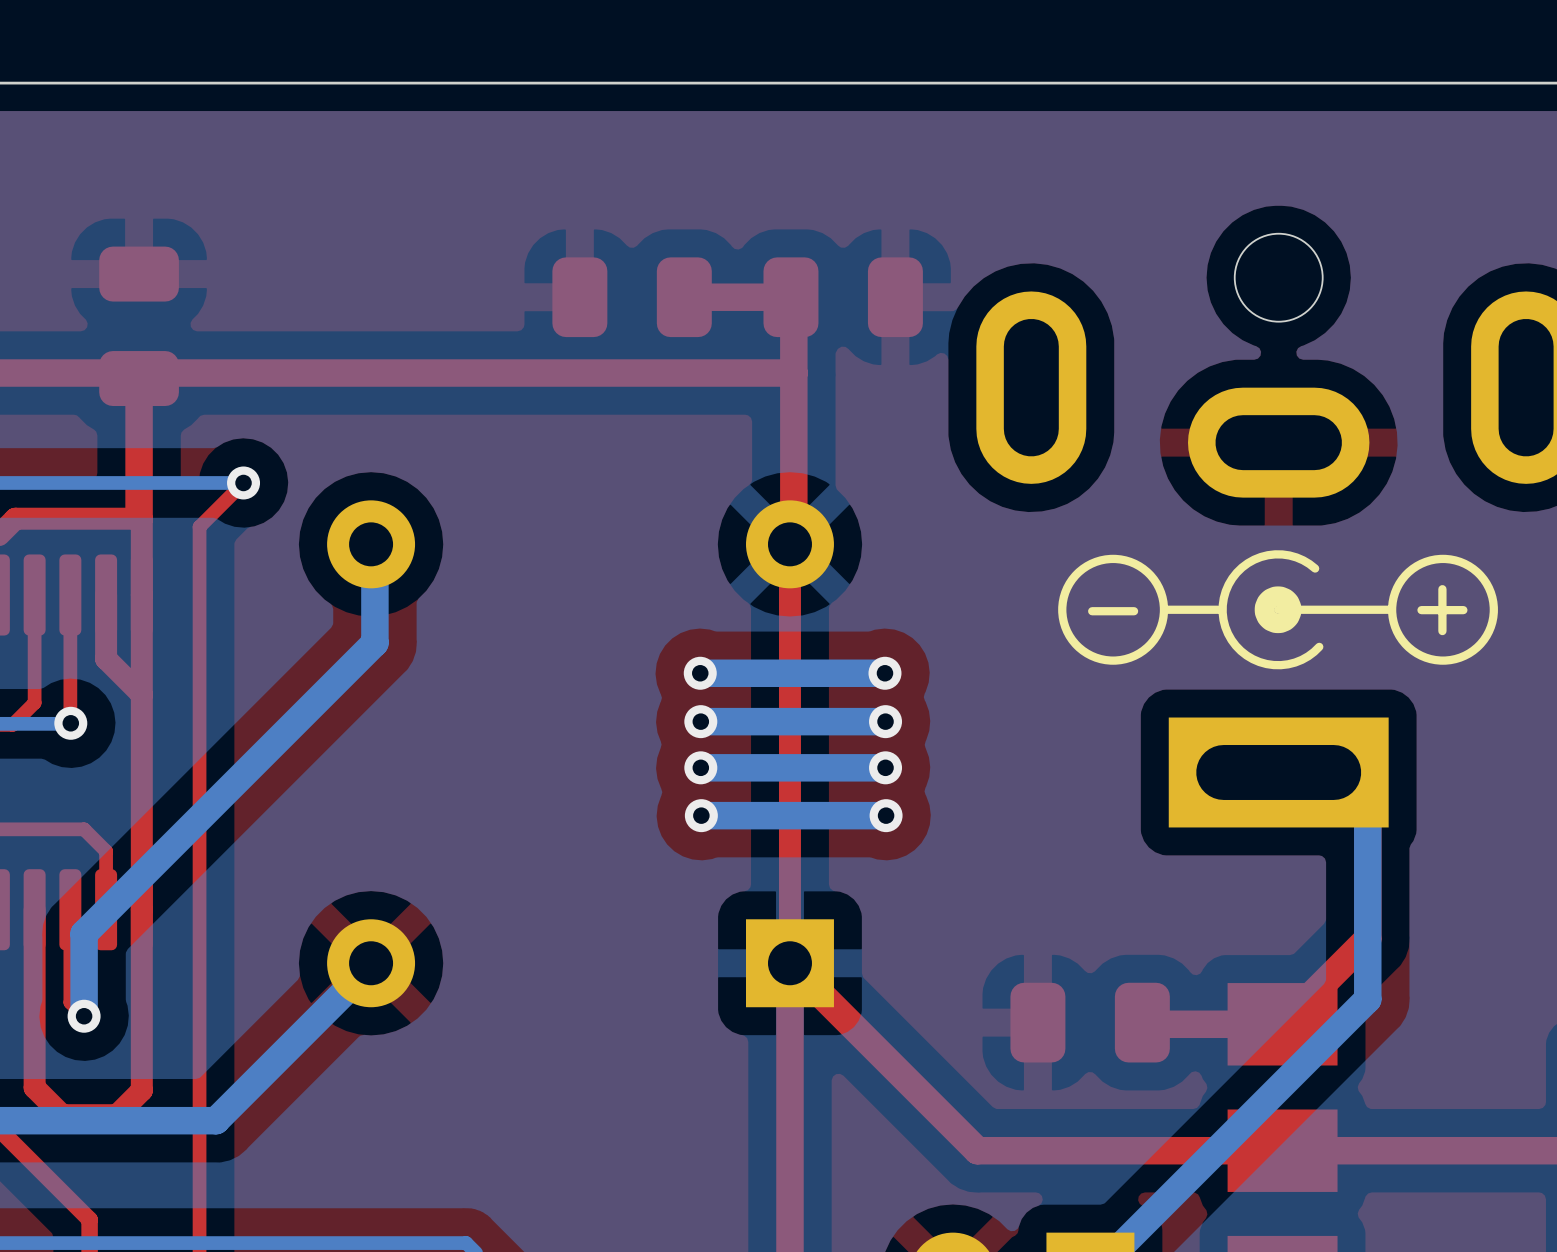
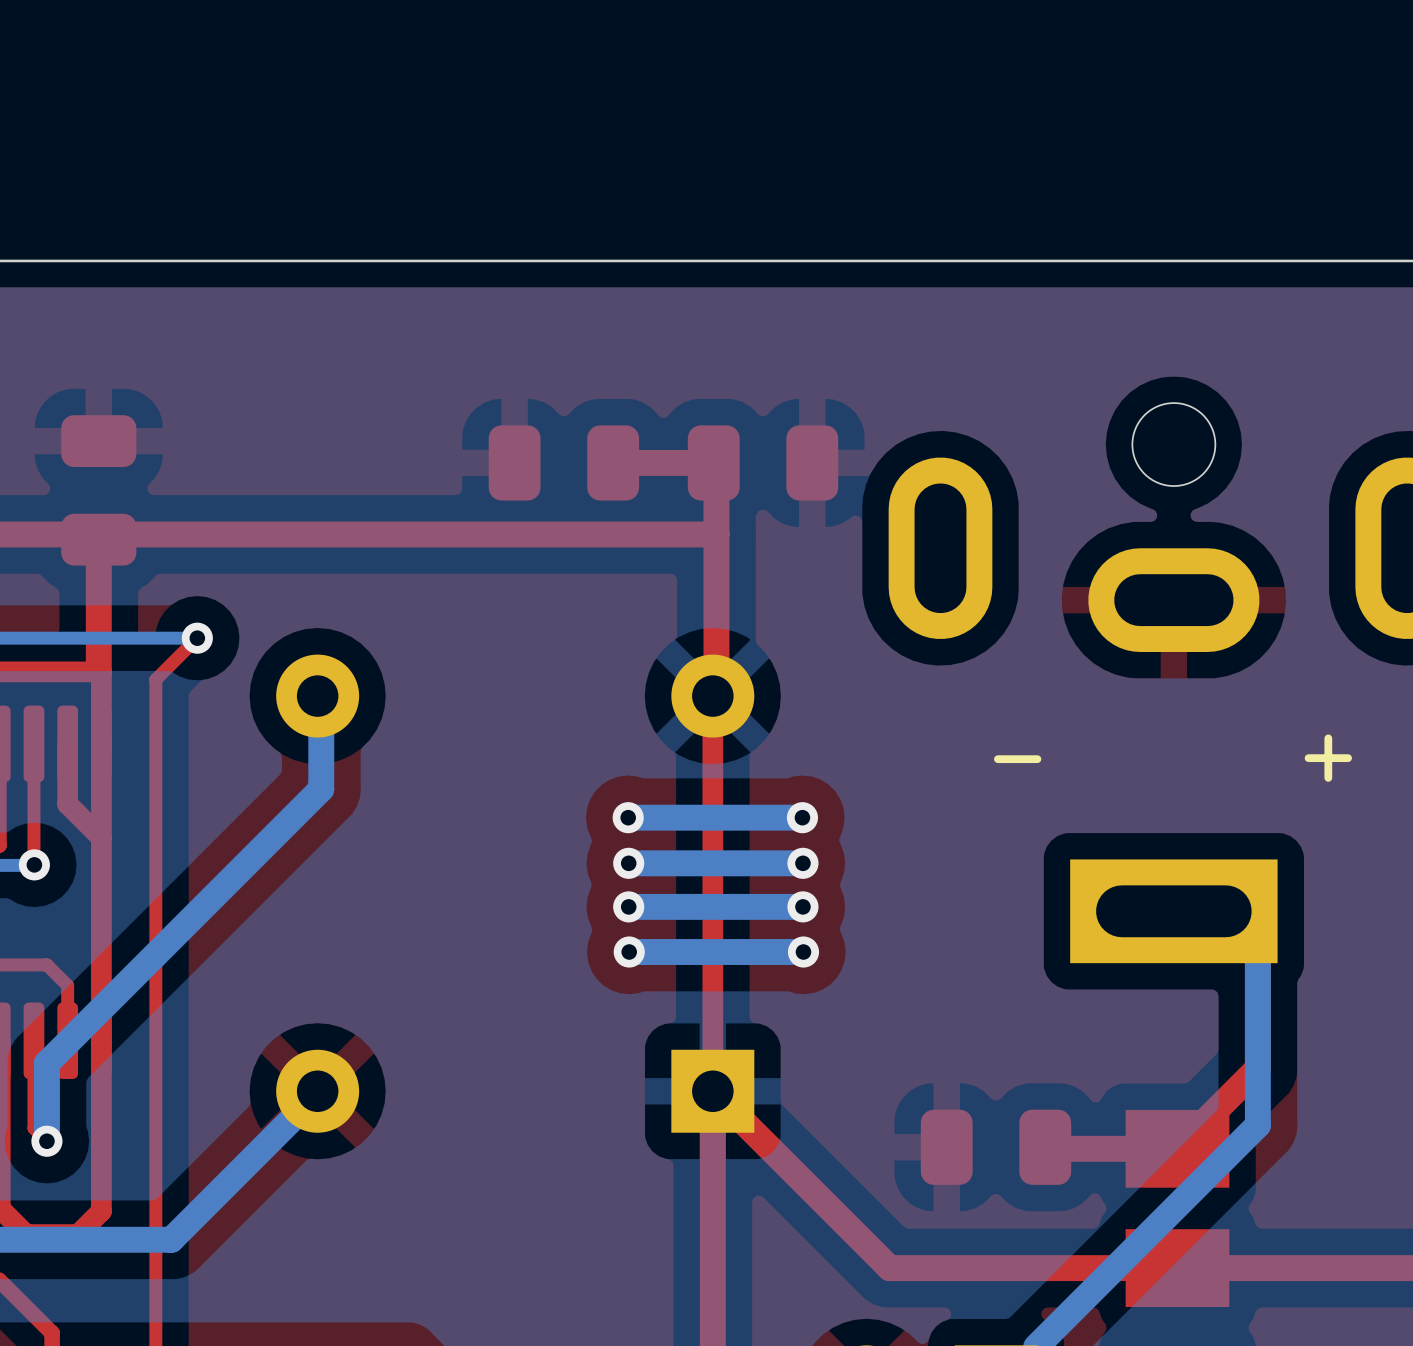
drawing: [1058, 550, 1498, 670] -> none

